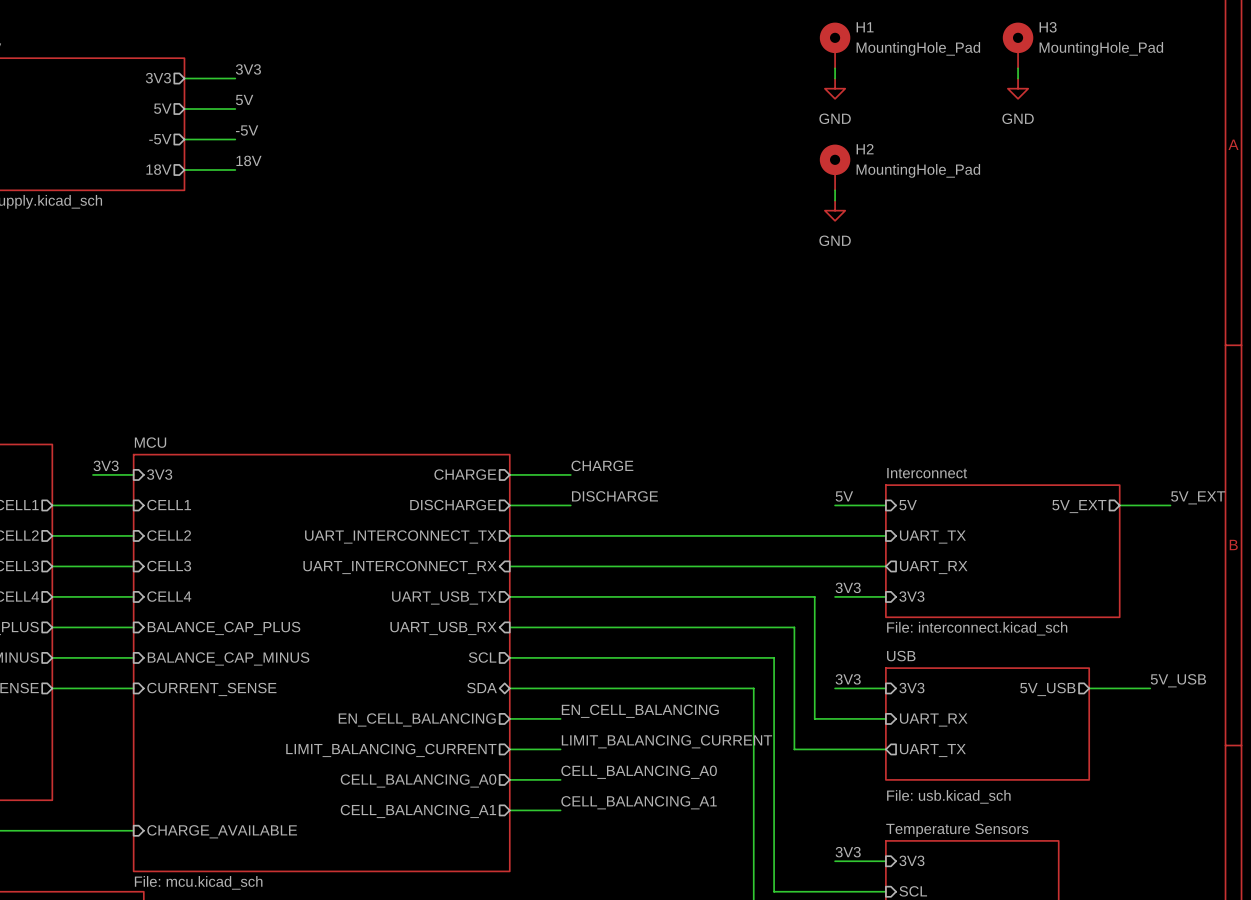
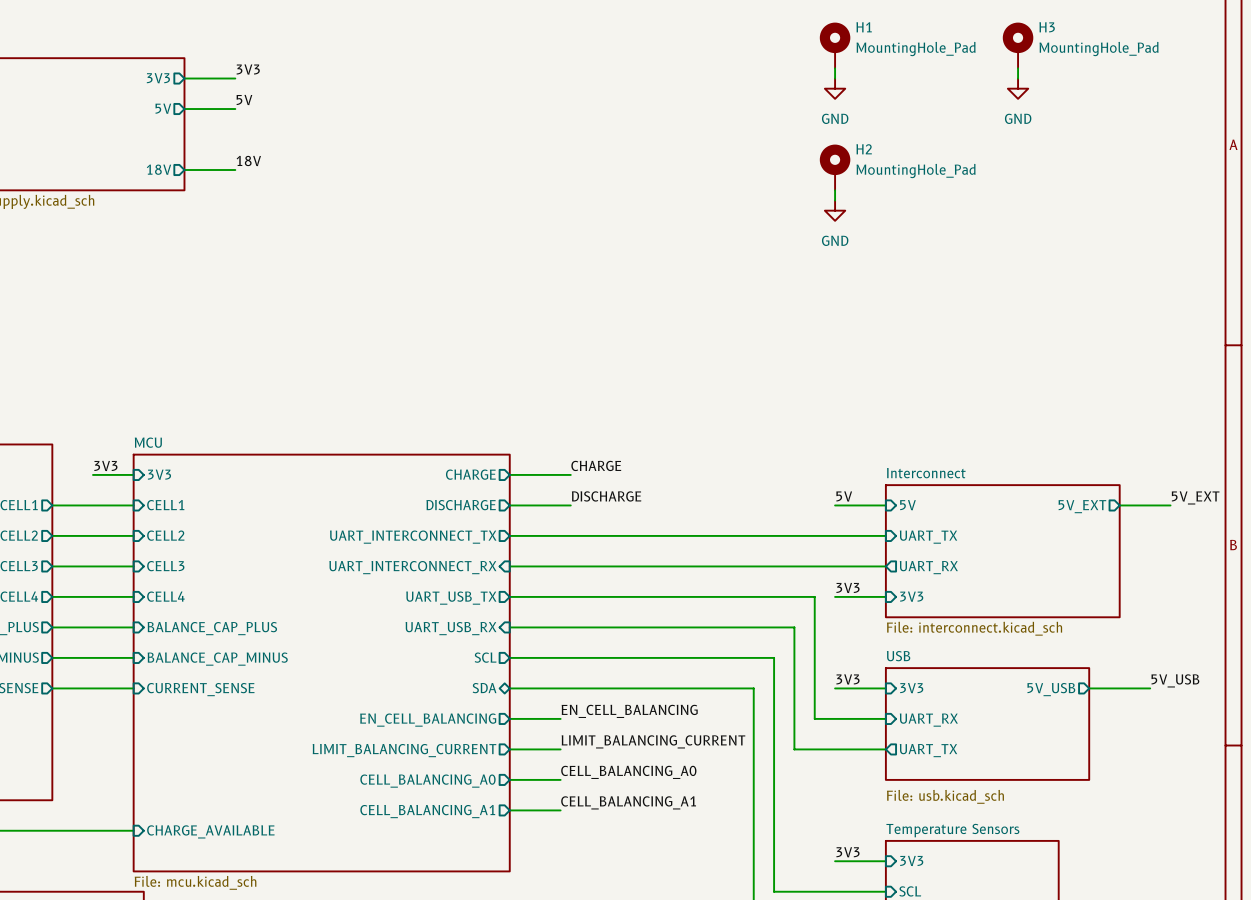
label: -5V (247, 130) -> none
sheet pin: -5V (160, 139) -> none
wire: (184, 139) (235, 139) -> none

